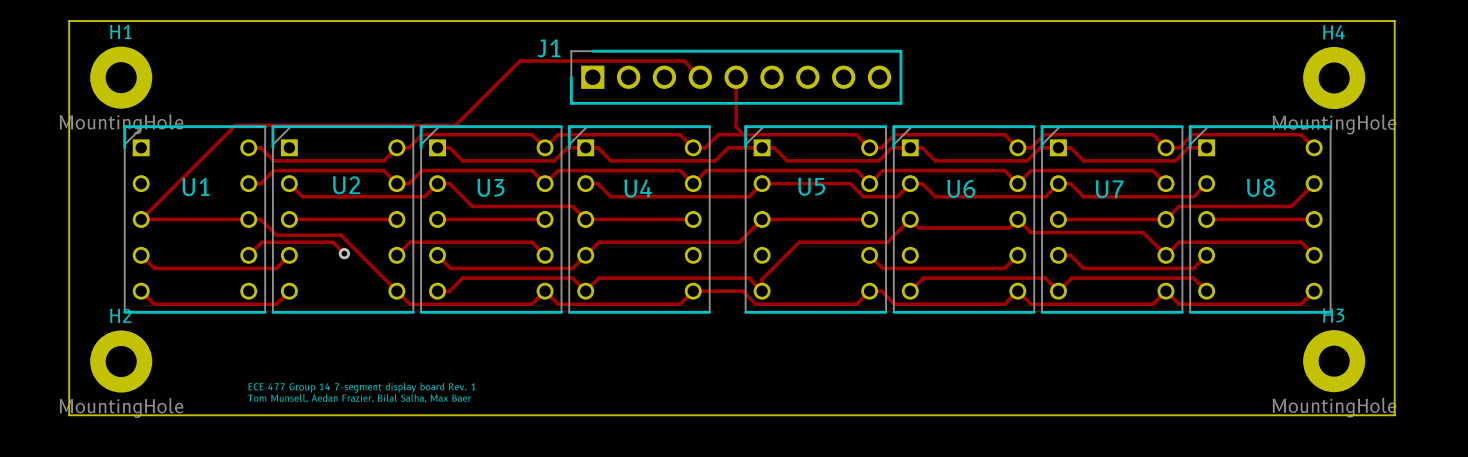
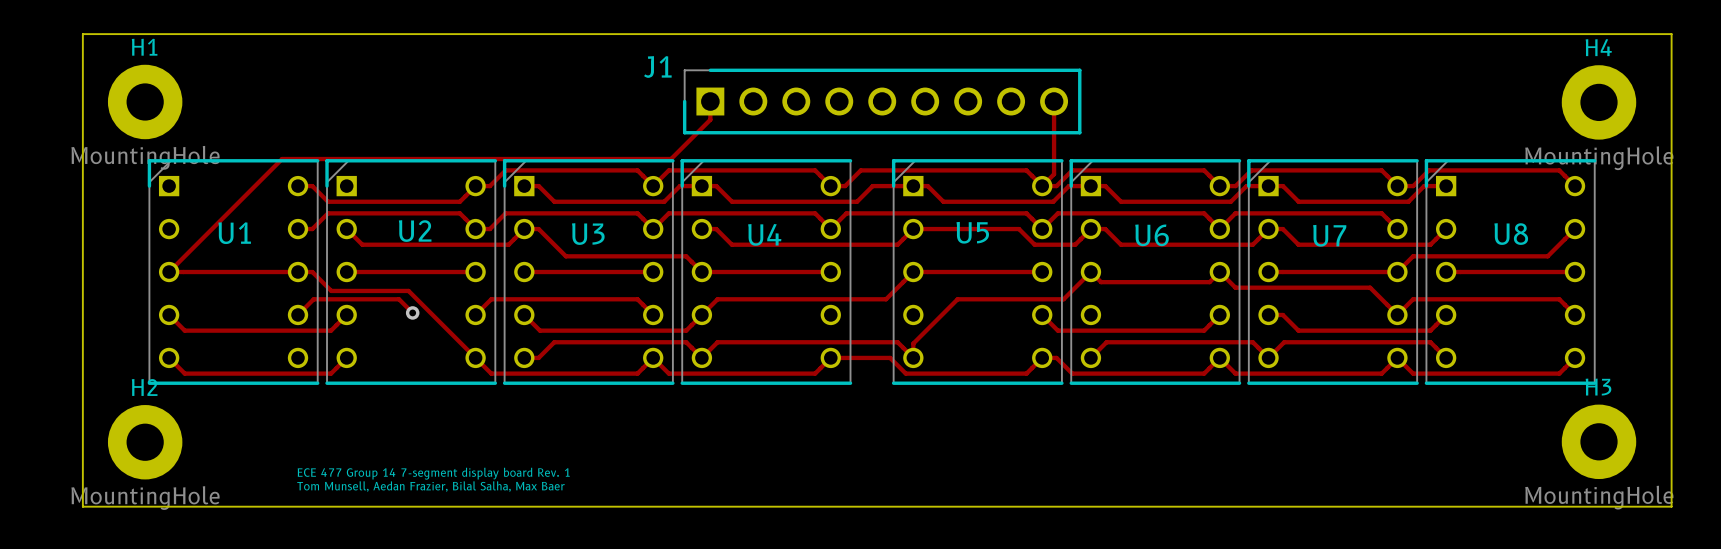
track: (700, 77) (684, 61) (519, 61) (455, 125) (235, 125) -> (710, 101) (710, 119) (671, 159) (282, 159)
track: (736, 77) (736, 127) (743, 134) -> none
track: none -> (1054, 101) (1054, 174) (1042, 186)

